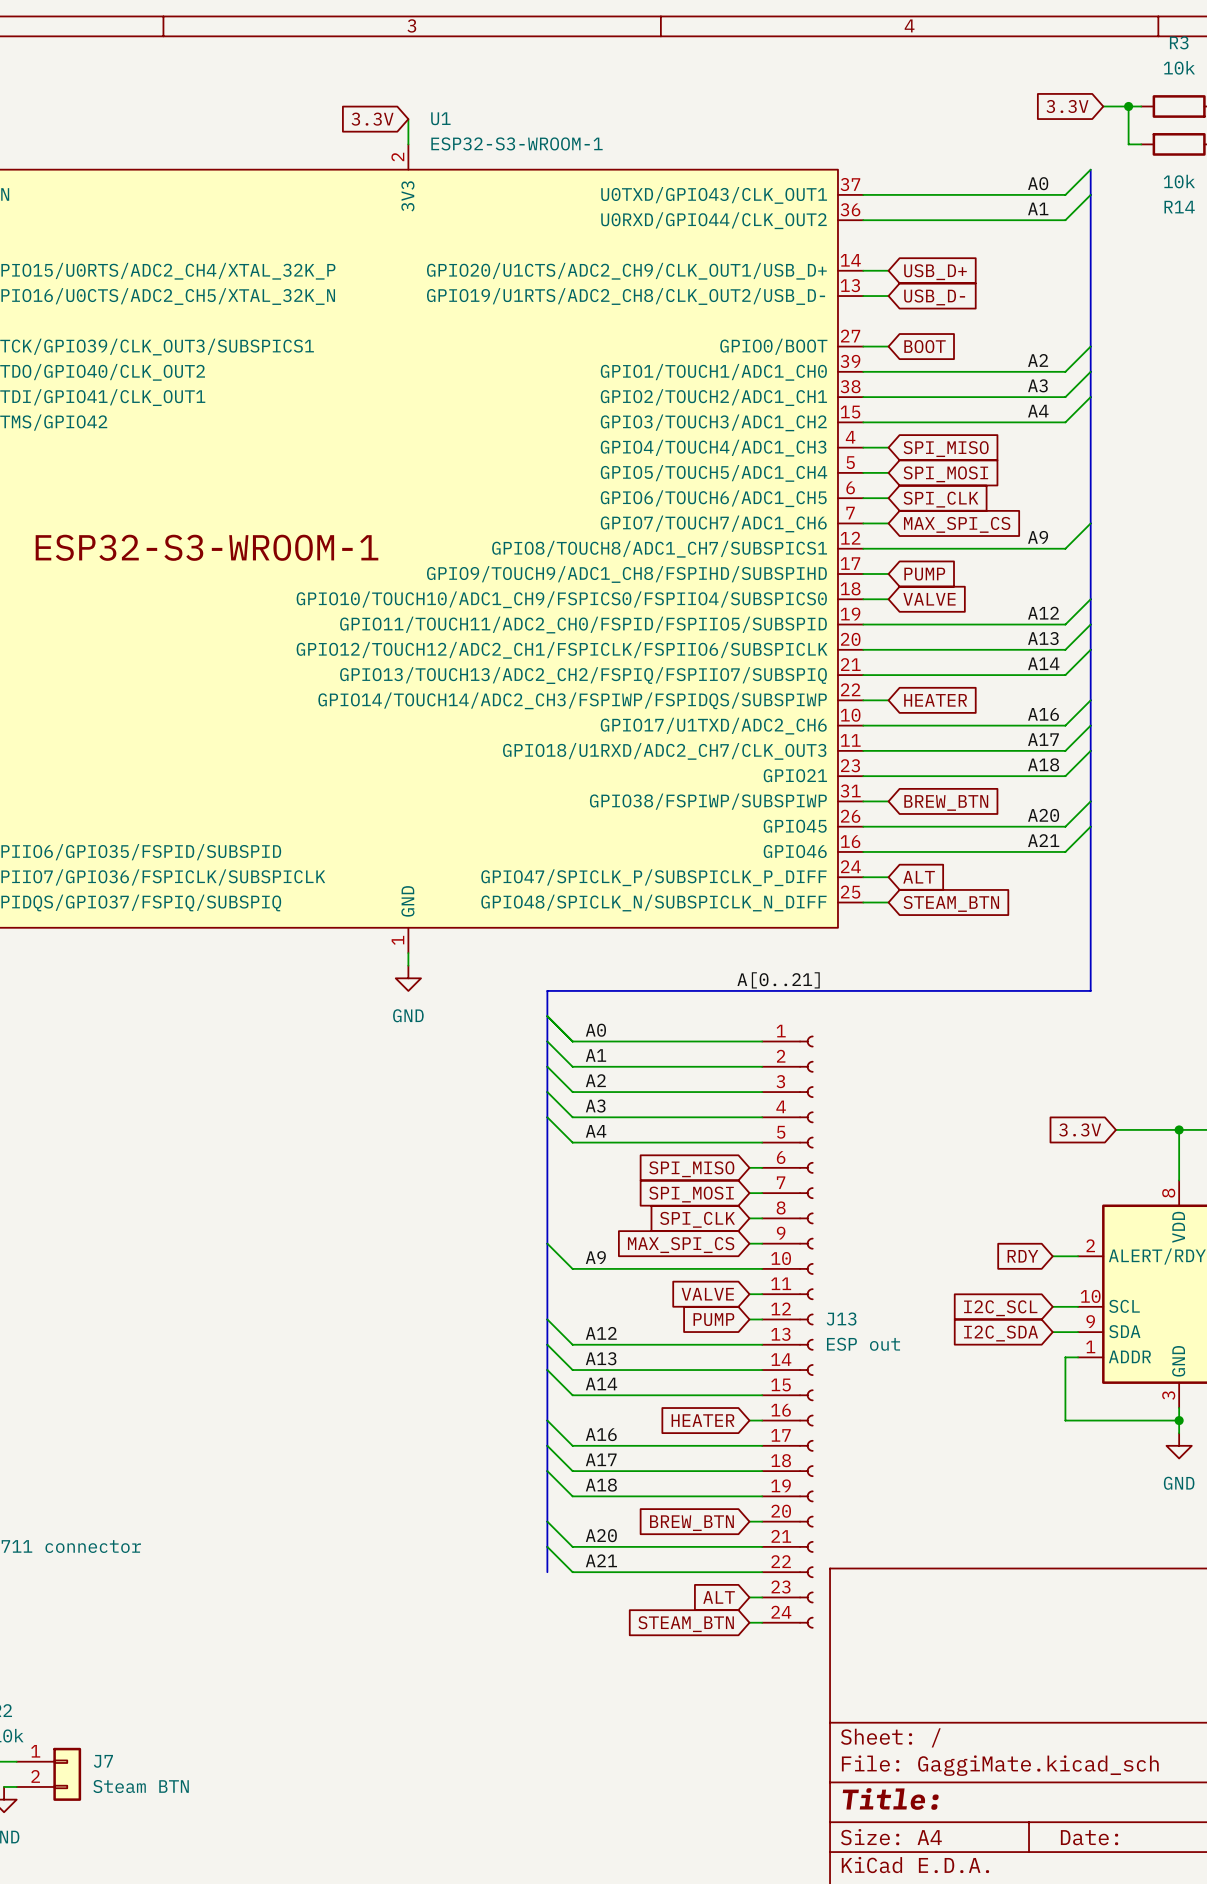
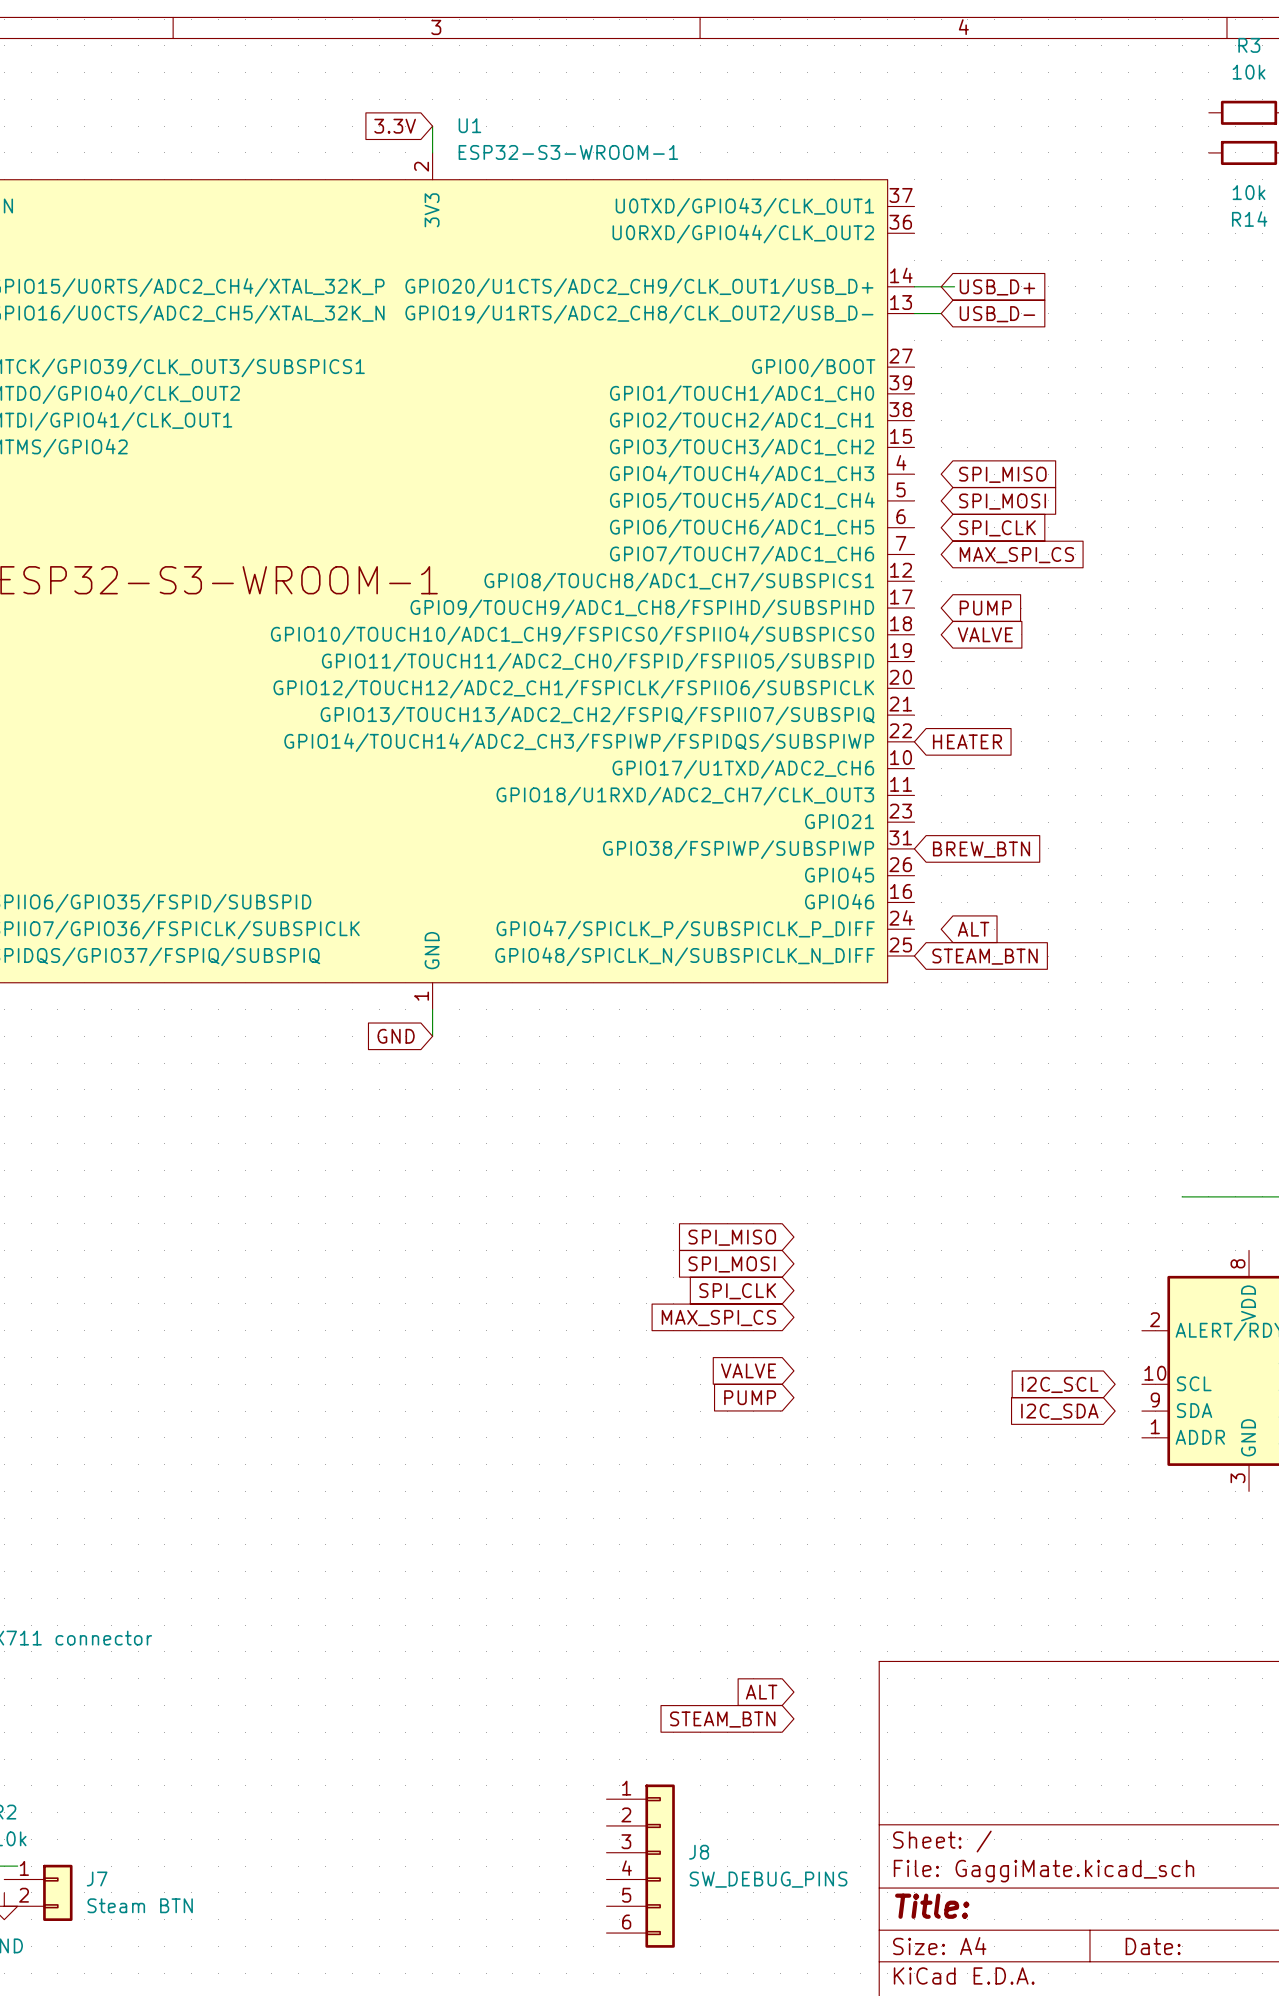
global label: 3.3V (1067, 106) -> none
wire: (1103, 106) (1141, 106) -> none
wire: (1128, 106) (1128, 144) (1141, 144) -> none
junction: (1128, 106) -> none
wire: (1090, 169) (1065, 194) (863, 194) -> none
bus: (1090, 169) (1090, 990) (547, 990) (547, 1572) -> none
label: A0 (1038, 183) -> none
wire: (1090, 194) (1065, 220) (863, 220) -> none
label: A1 (1038, 208) -> none
wire: none -> (941, 286) (954, 286)
wire: (863, 346) (888, 346) -> none
global label: BOOT (925, 346) -> none
wire: (1090, 346) (1065, 371) (863, 371) -> none
label: A2 (1038, 360) -> none
wire: (1090, 371) (1065, 397) (863, 397) -> none
label: A3 (1037, 385) -> none
wire: (1090, 397) (1065, 422) (863, 422) -> none
label: A4 (1038, 411) -> none
wire: (863, 447) (888, 447) -> none
wire: (863, 472) (888, 472) -> none
wire: (863, 498) (888, 498) -> none
wire: (863, 523) (888, 523) -> none
wire: (1090, 523) (1065, 548) (863, 548) -> none
label: A9 (1038, 537) -> none
wire: (863, 574) (888, 574) -> none
wire: (863, 599) (888, 599) -> none
wire: (1090, 599) (1065, 624) (863, 624) -> none
label: A12 (1043, 613) -> none
wire: (1090, 624) (1065, 649) (863, 649) -> none
label: A13 (1043, 638) -> none
wire: (1090, 649) (1065, 675) (863, 675) -> none
label: A14 (1043, 663) -> none
wire: (863, 700) (888, 700) -> none
global label position: HEATER (935, 700) -> HEATER (967, 741)
wire: (1090, 700) (1065, 725) (863, 725) -> none
label: A16 (1043, 714) -> none
wire: (1090, 725) (1065, 750) (863, 750) -> none
label: A17 (1043, 739) -> none
wire: (1090, 750) (1065, 776) (863, 776) -> none
label: A18 (1043, 764) -> none
wire: (863, 801) (888, 801) -> none
wire: (1090, 801) (1065, 826) (863, 826) -> none
global label position: BREW_BTN (946, 802) -> BREW_BTN (981, 849)
label: A20 (1043, 815) -> none
wire: (1090, 826) (1065, 851) (863, 851) -> none
label: A21 (1043, 840) -> none
wire: (863, 877) (888, 877) -> none
wire: (863, 902) (888, 902) -> none
global label position: STEAM_BTN (951, 903) -> STEAM_BTN (985, 956)
global label: none -> GND (396, 1036)
power symbol: GND (408, 978) -> none
label: A[0..21] (778, 980) -> none
wire: (547, 1016) (572, 1041) (762, 1041) -> none
label: A0 (595, 1030) -> none
wire: (547, 1041) (572, 1066) (762, 1066) -> none
label: A1 (596, 1055) -> none
wire: (547, 1066) (572, 1092) (762, 1092) -> none
label: A2 (595, 1080) -> none
wire: (547, 1092) (572, 1117) (762, 1117) -> none
label: A3 (595, 1106) -> none
wire: (547, 1117) (572, 1142) (762, 1142) -> none
global label: 3.3V (1080, 1129) -> none
wire: (1179, 1129) (1179, 1180) -> none
junction: (1179, 1129) -> none
label: A4 (596, 1131) -> none
wire: (749, 1167) (762, 1167) -> none
wire: (749, 1193) (762, 1193) -> none
wire: (749, 1218) (762, 1218) -> none
wire: (547, 1243) (572, 1268) (762, 1268) -> none
wire: (749, 1243) (762, 1243) -> none
global label: RDY (1022, 1256) -> none
wire: (1052, 1256) (1078, 1256) -> none
label: A9 (595, 1257) -> none
wire: (749, 1294) (762, 1294) -> none
wire: (1052, 1306) (1078, 1306) -> none
wire: (547, 1319) (572, 1344) (762, 1344) -> none
wire: (749, 1319) (762, 1319) -> none
J13: ESP out (787, 1332) -> none
wire: (1052, 1332) (1078, 1332) -> none
label: A12 (601, 1333) -> none
wire: (547, 1344) (572, 1370) (762, 1370) -> none
wire: (1078, 1357) (1065, 1357) (1065, 1420) (1179, 1420) -> none
label: A13 (601, 1358) -> none
wire: (547, 1370) (572, 1395) (762, 1395) -> none
label: A14 (601, 1384) -> none
wire: (1179, 1407) (1179, 1433) -> none
wire: (547, 1420) (572, 1445) (762, 1445) -> none
global label: HEATER (703, 1420) -> none
wire: (749, 1420) (762, 1420) -> none
junction: (1179, 1420) -> none
label: A16 (601, 1434) -> none
wire: (547, 1445) (572, 1471) (762, 1471) -> none
power symbol: GND (1179, 1445) -> none
label: A17 (601, 1459) -> none
wire: (547, 1471) (572, 1496) (762, 1496) -> none
label: A18 (601, 1485) -> none
wire: (547, 1521) (572, 1546) (762, 1546) -> none
wire: (749, 1521) (762, 1521) -> none
global label: BREW_BTN (691, 1523) -> none
label: A20 (601, 1535) -> none
wire: (547, 1546) (572, 1572) (762, 1572) -> none
label: A21 (601, 1560) -> none
wire: (749, 1597) (762, 1597) -> none
wire: (749, 1622) (762, 1622) -> none
J8: none -> SW_DEBUG_PINS (640, 1866)
J7 position: (48, 1774) -> (38, 1892)
wire: (4, 1786) (16, 1786) -> none

